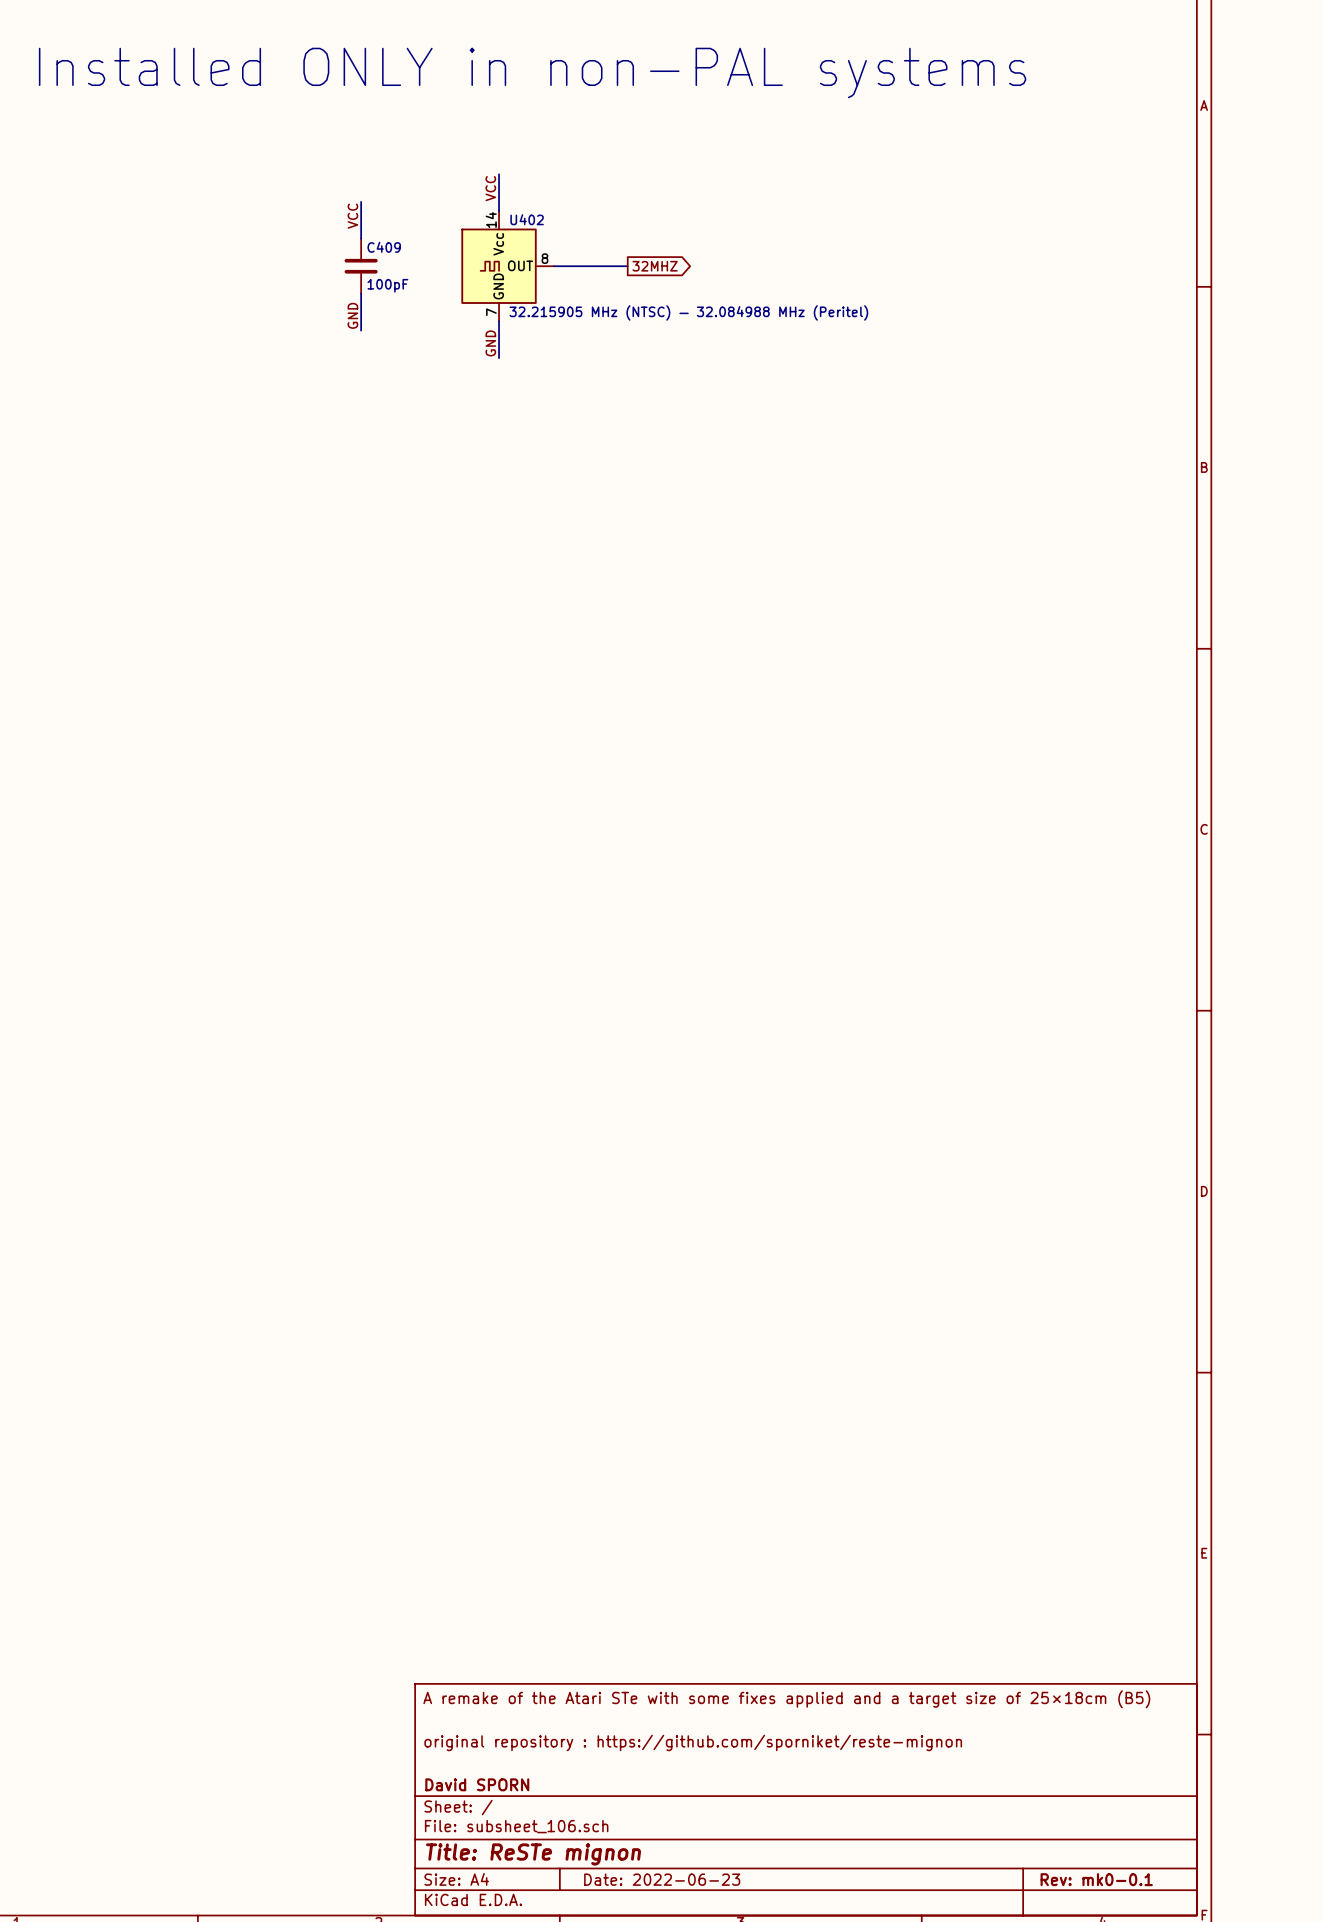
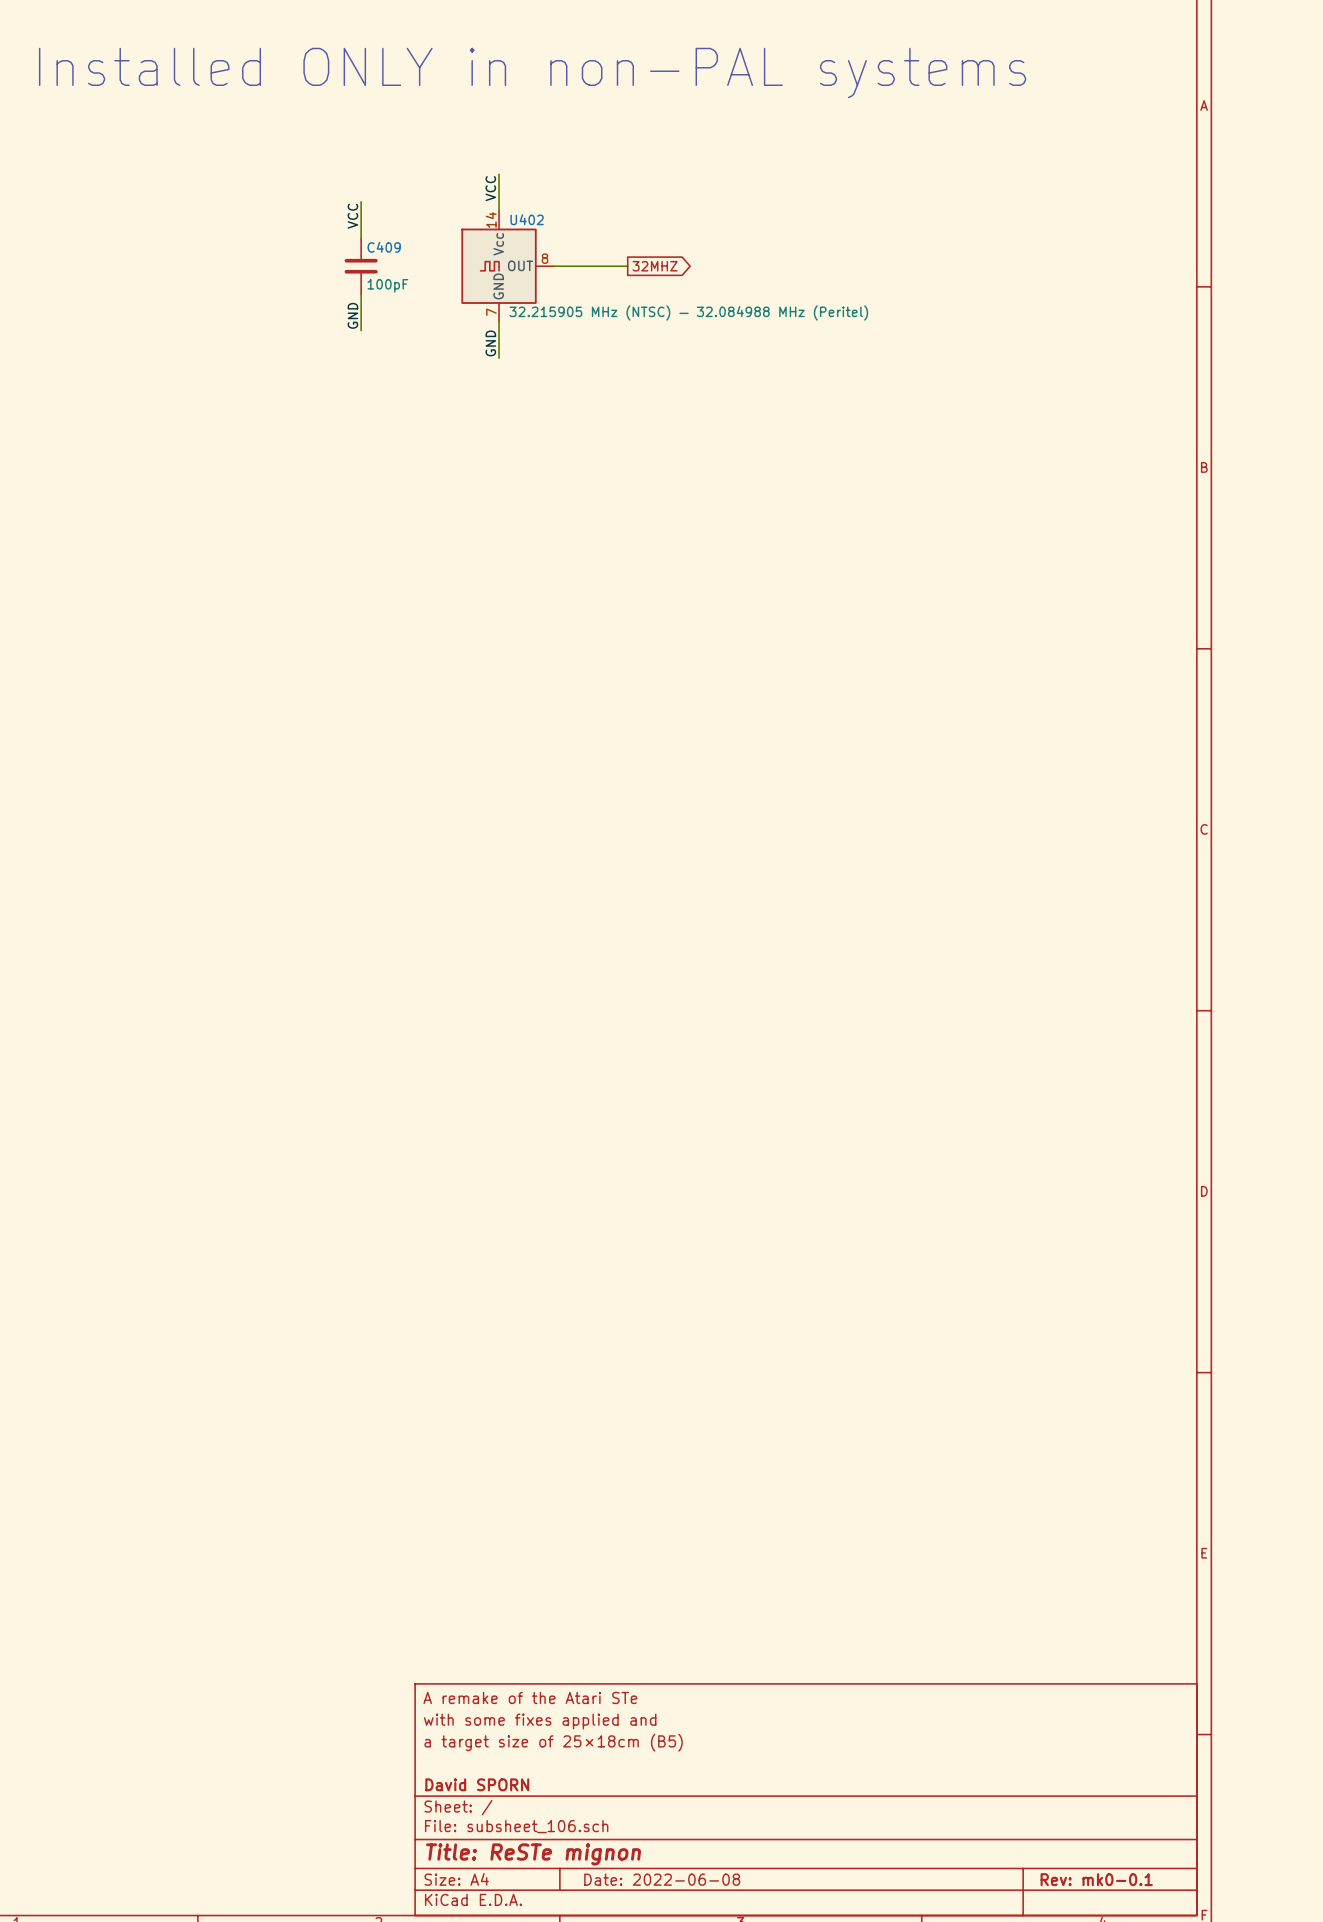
title block: A remake of the Atari STe with some fixes applied and a target size of 25×18cm (B5) (786, 1699) -> A remake of the Atari STe (530, 1697)
title block: none -> with some fixes applied and (540, 1721)
title block: original repository : https://github.com/sporniket/reste-mignon (693, 1742) -> a target size of 25×18cm (B5) (553, 1742)
title block: Date: 2022-06-23 (662, 1879) -> Date: 2022-06-08 (662, 1879)

